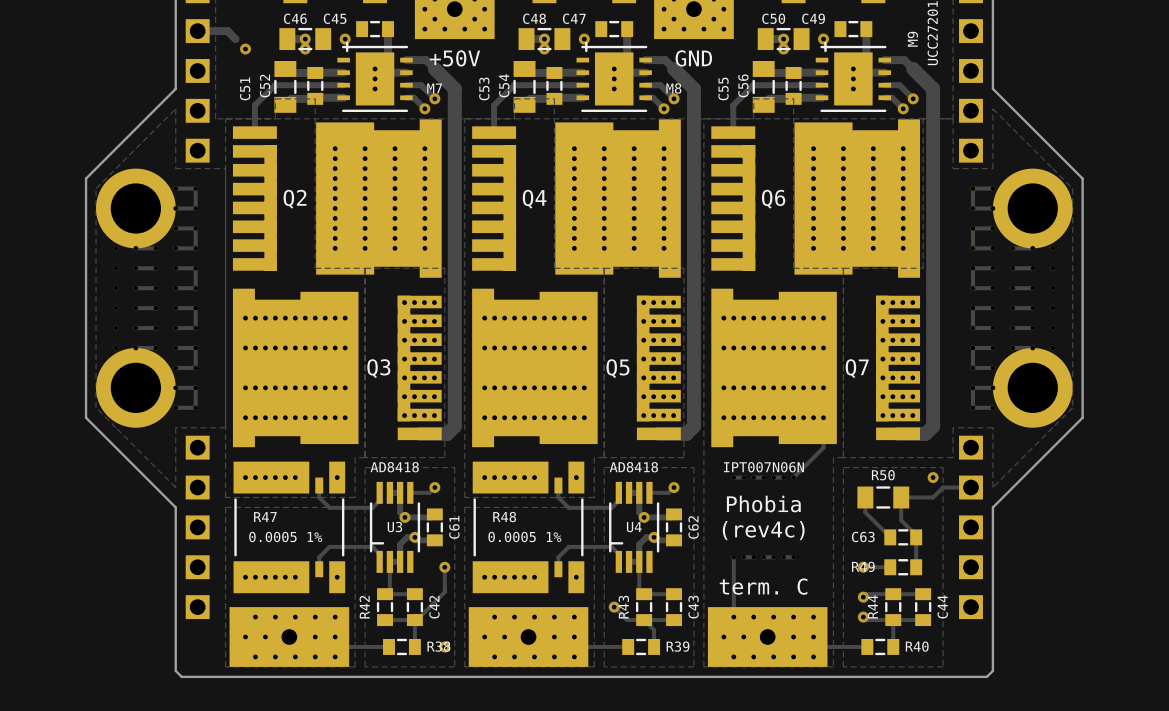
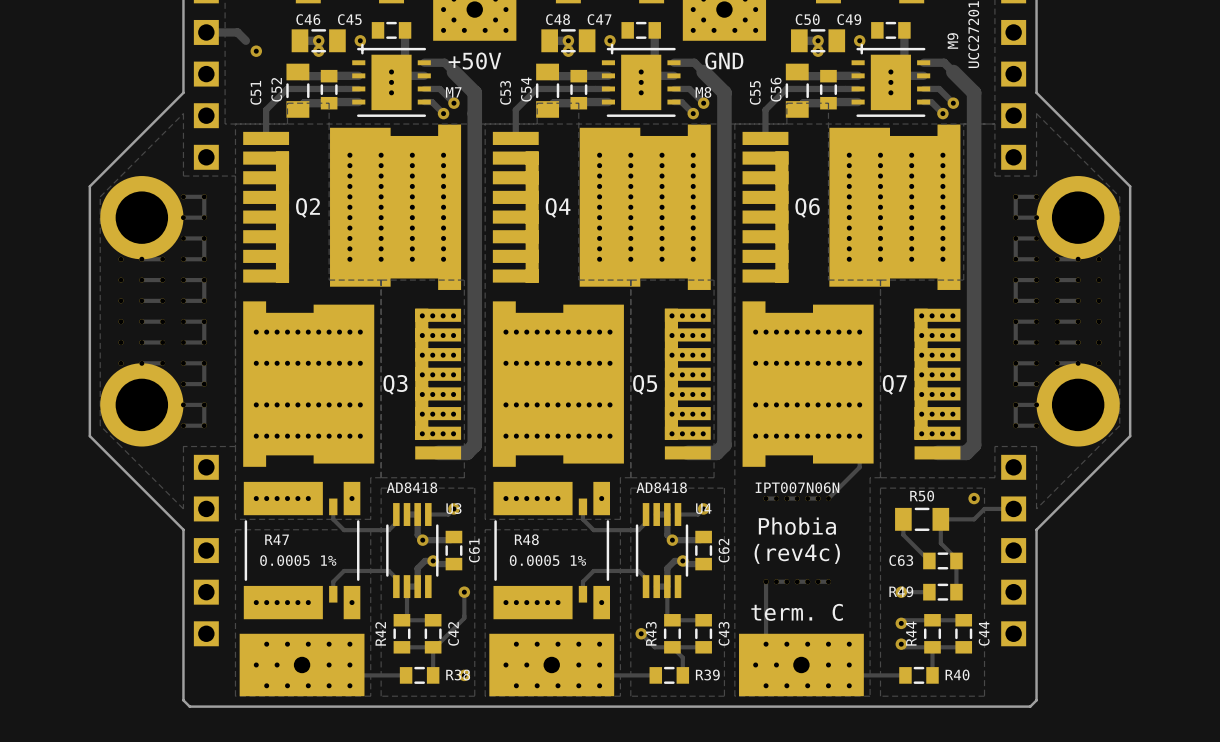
U3 footprint: [369, 481, 421, 573] -> [386, 503, 439, 599]
U4 footprint: [609, 481, 660, 573] -> [635, 503, 689, 599]
U3 name position: U3 (394, 527) -> U3 (453, 508)
U4 name position: U4 (634, 527) -> U4 (703, 508)

